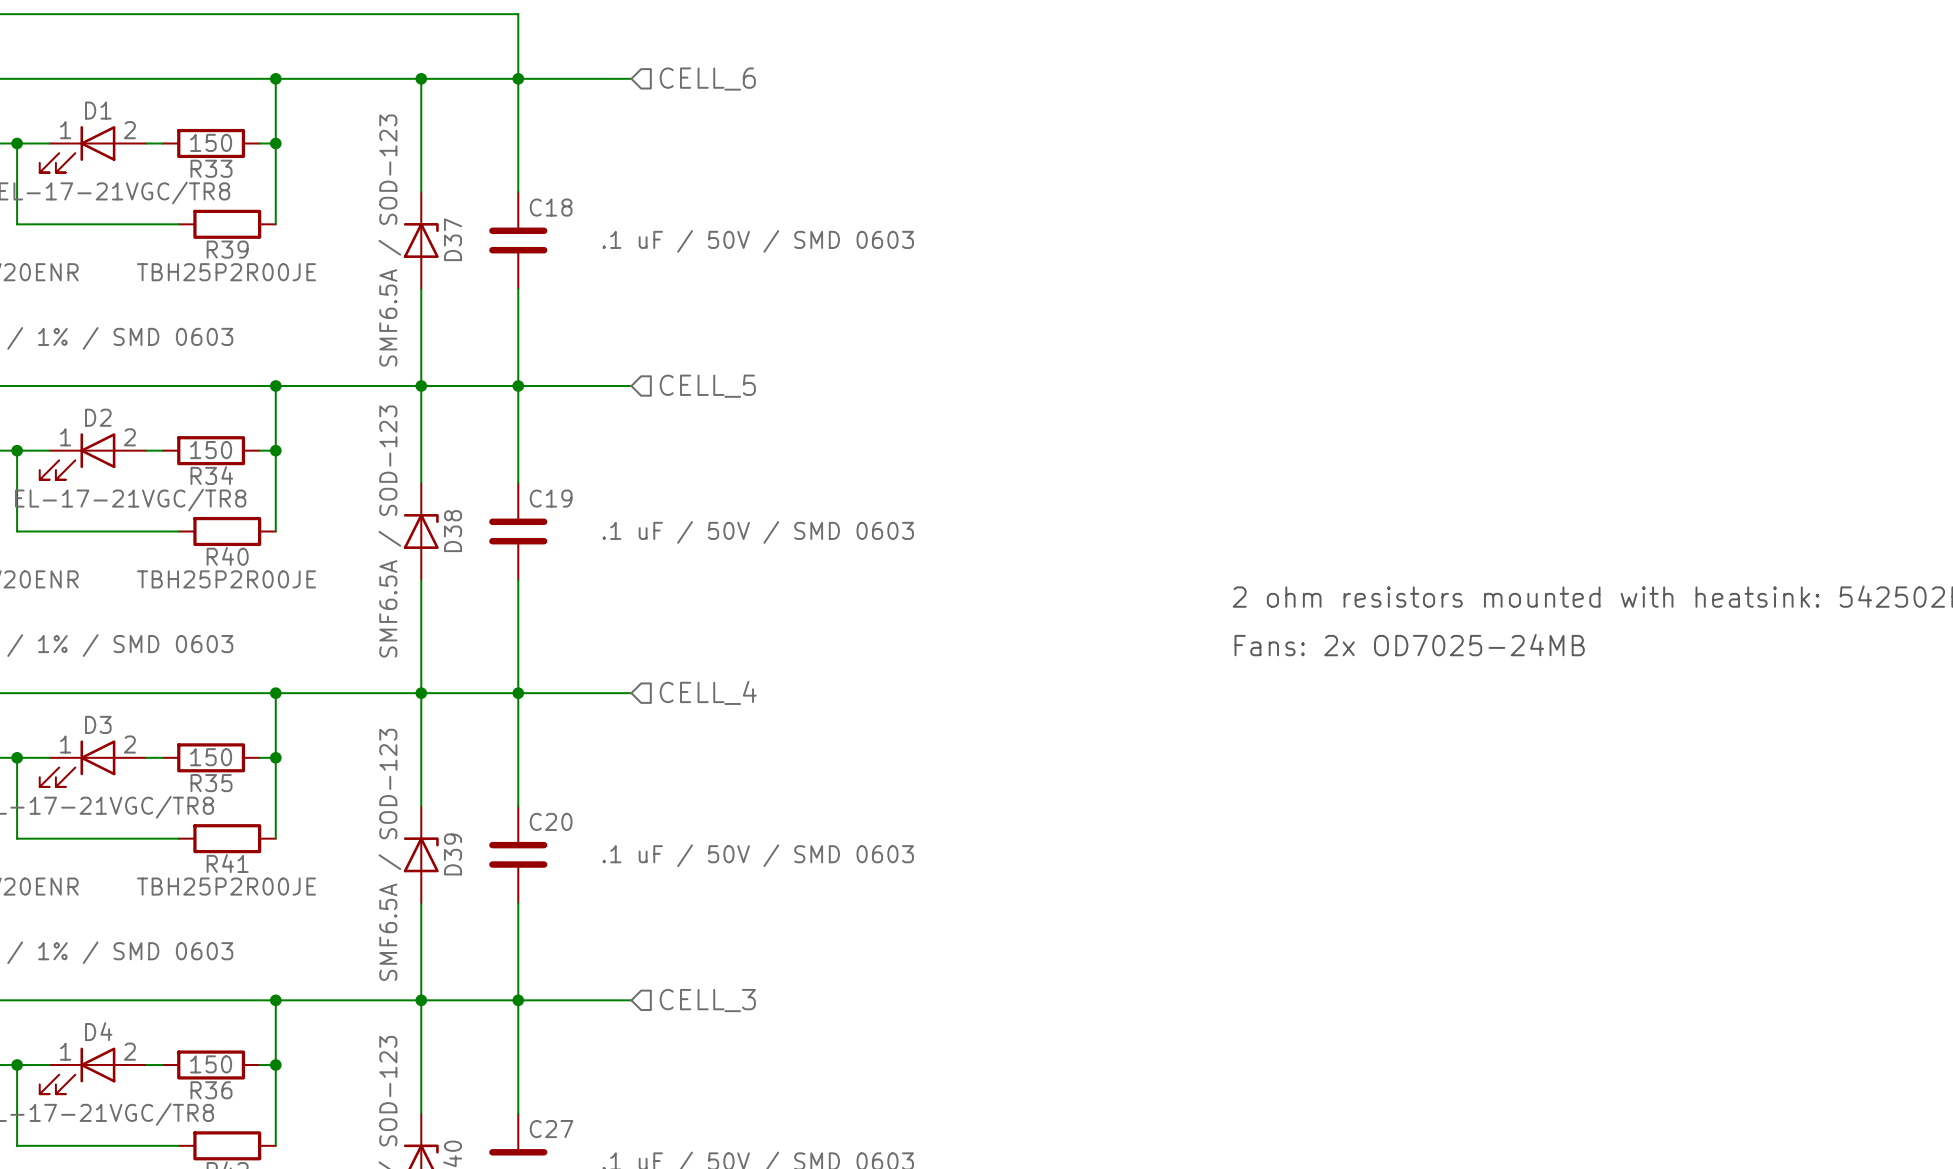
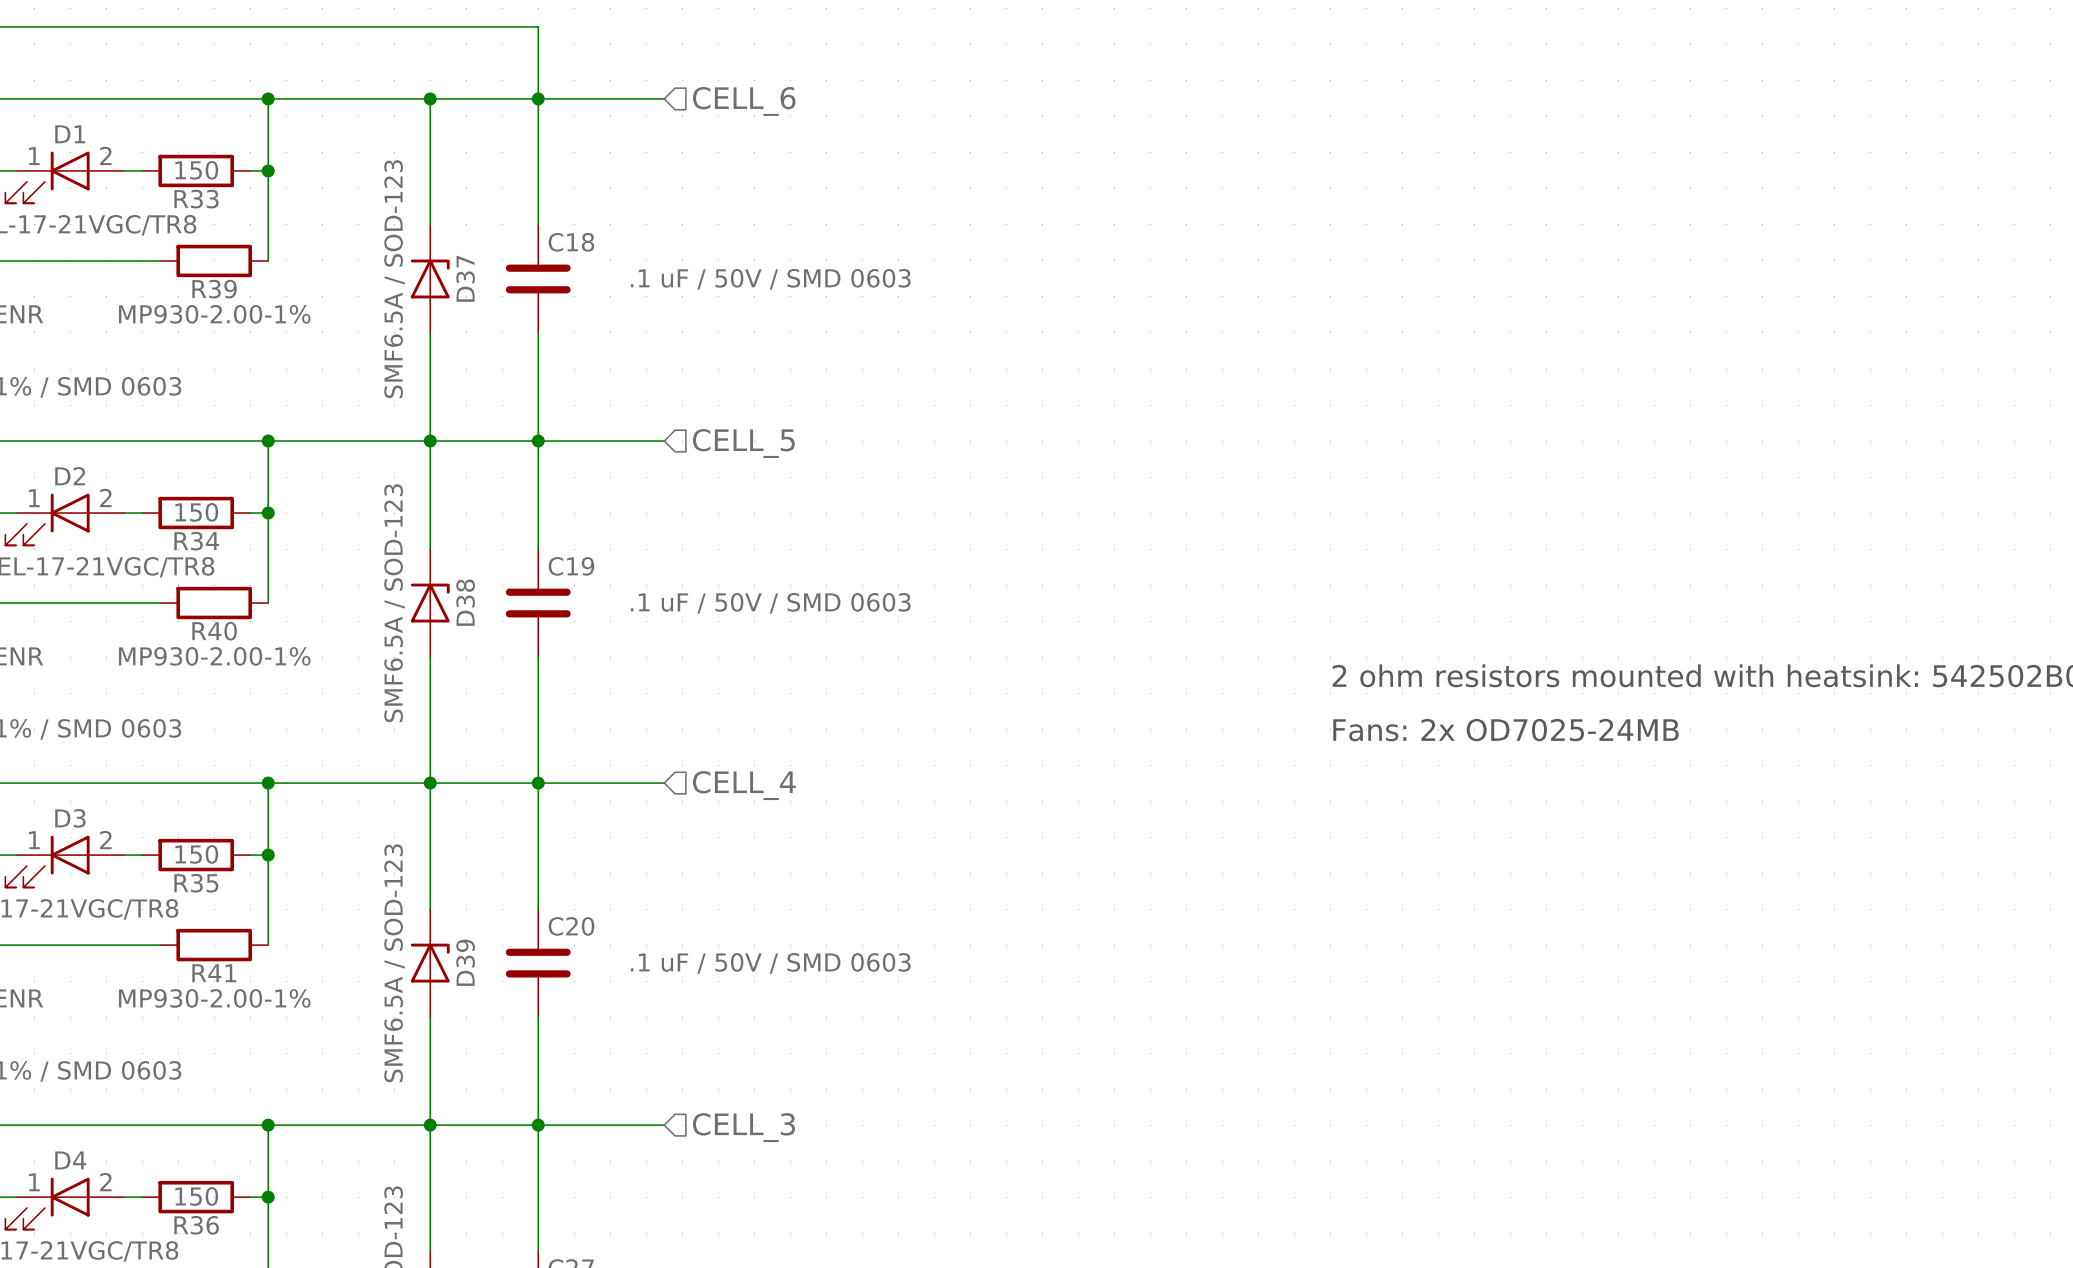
R39 value: TBH25P2R00JE (226, 272) -> MP930-2.00-1% (214, 314)
R40 value: TBH25P2R00JE (226, 579) -> MP930-2.00-1% (214, 656)
R41 value: TBH25P2R00JE (226, 886) -> MP930-2.00-1% (214, 998)

